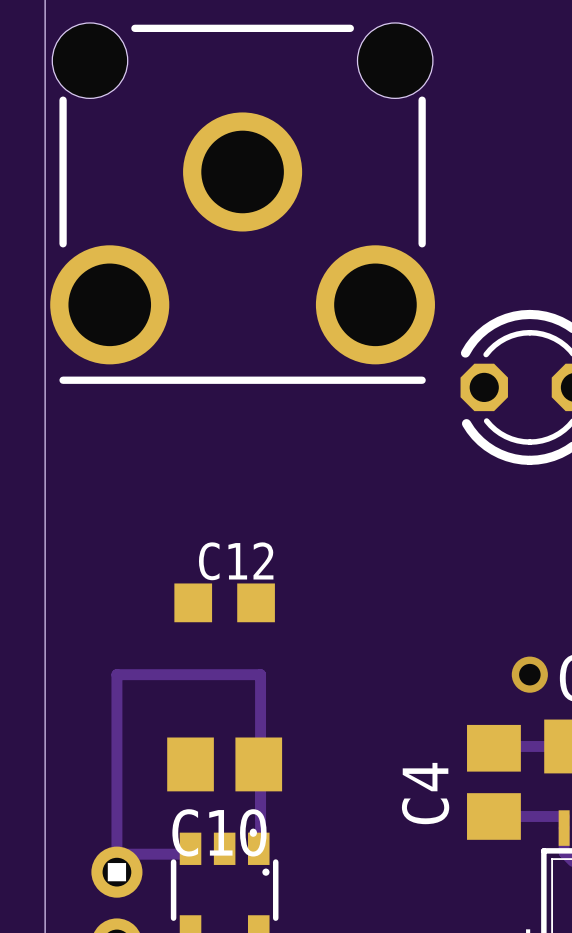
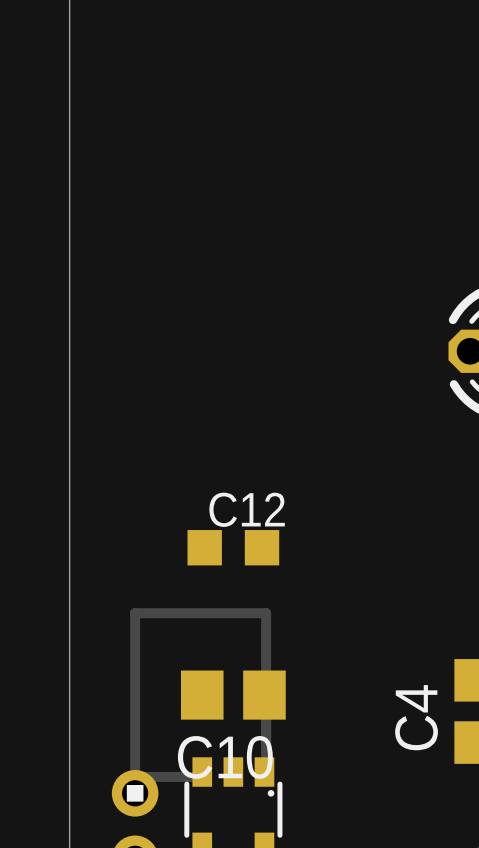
part: (242, 203) -> none

